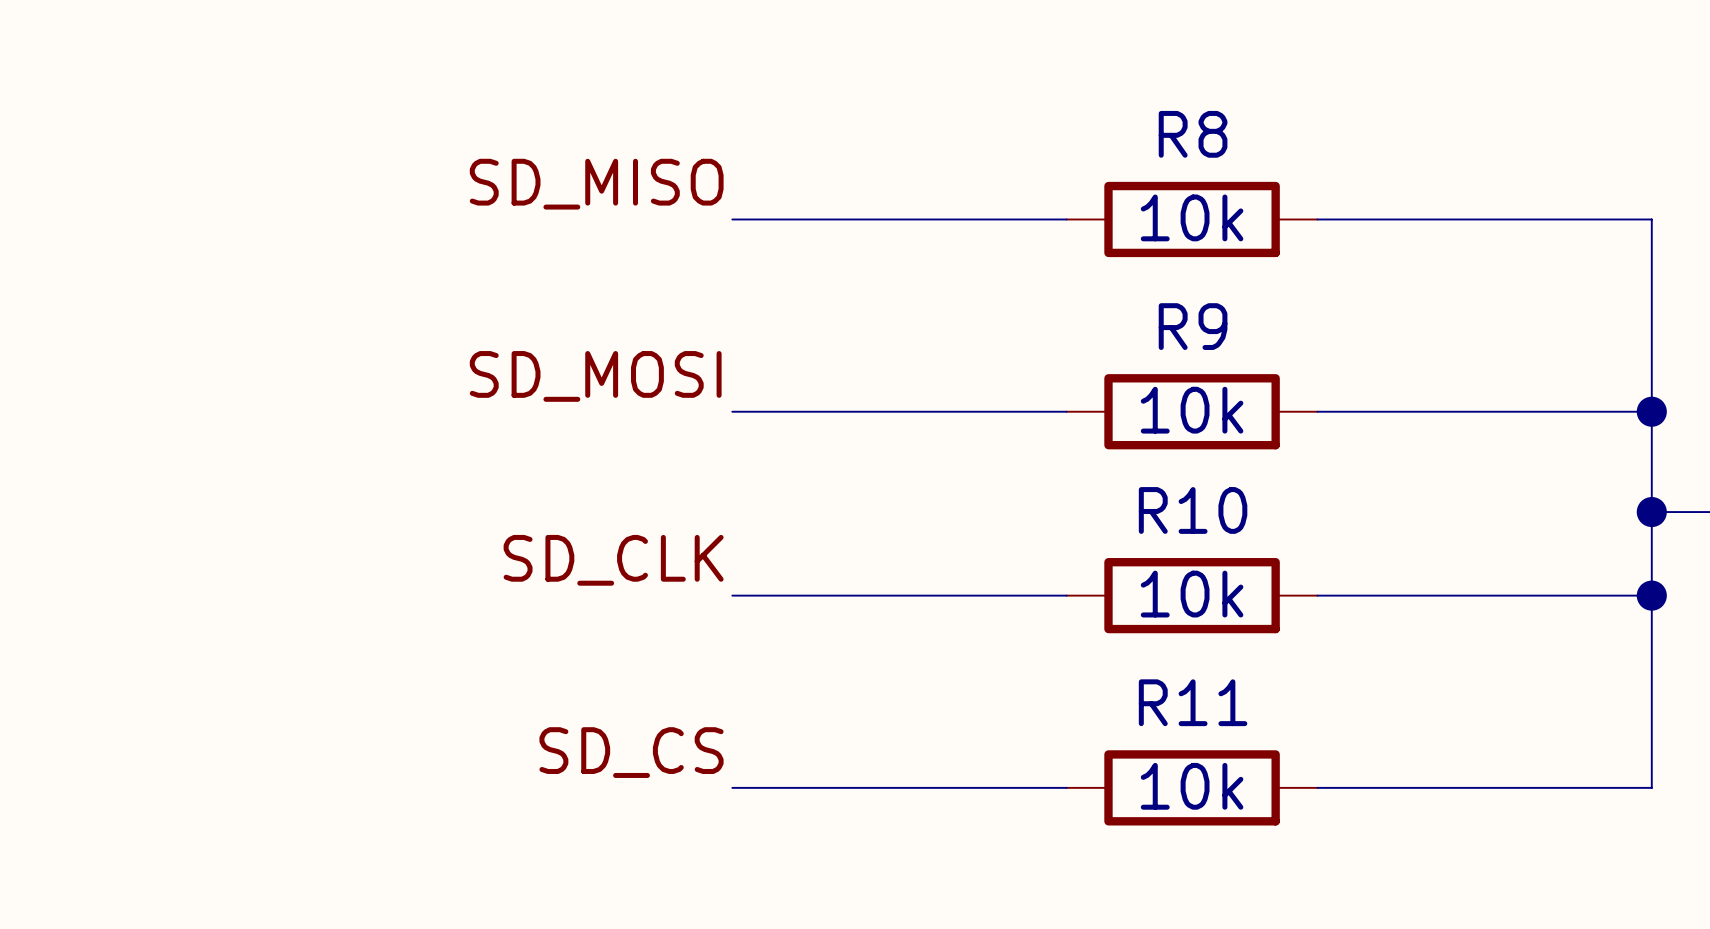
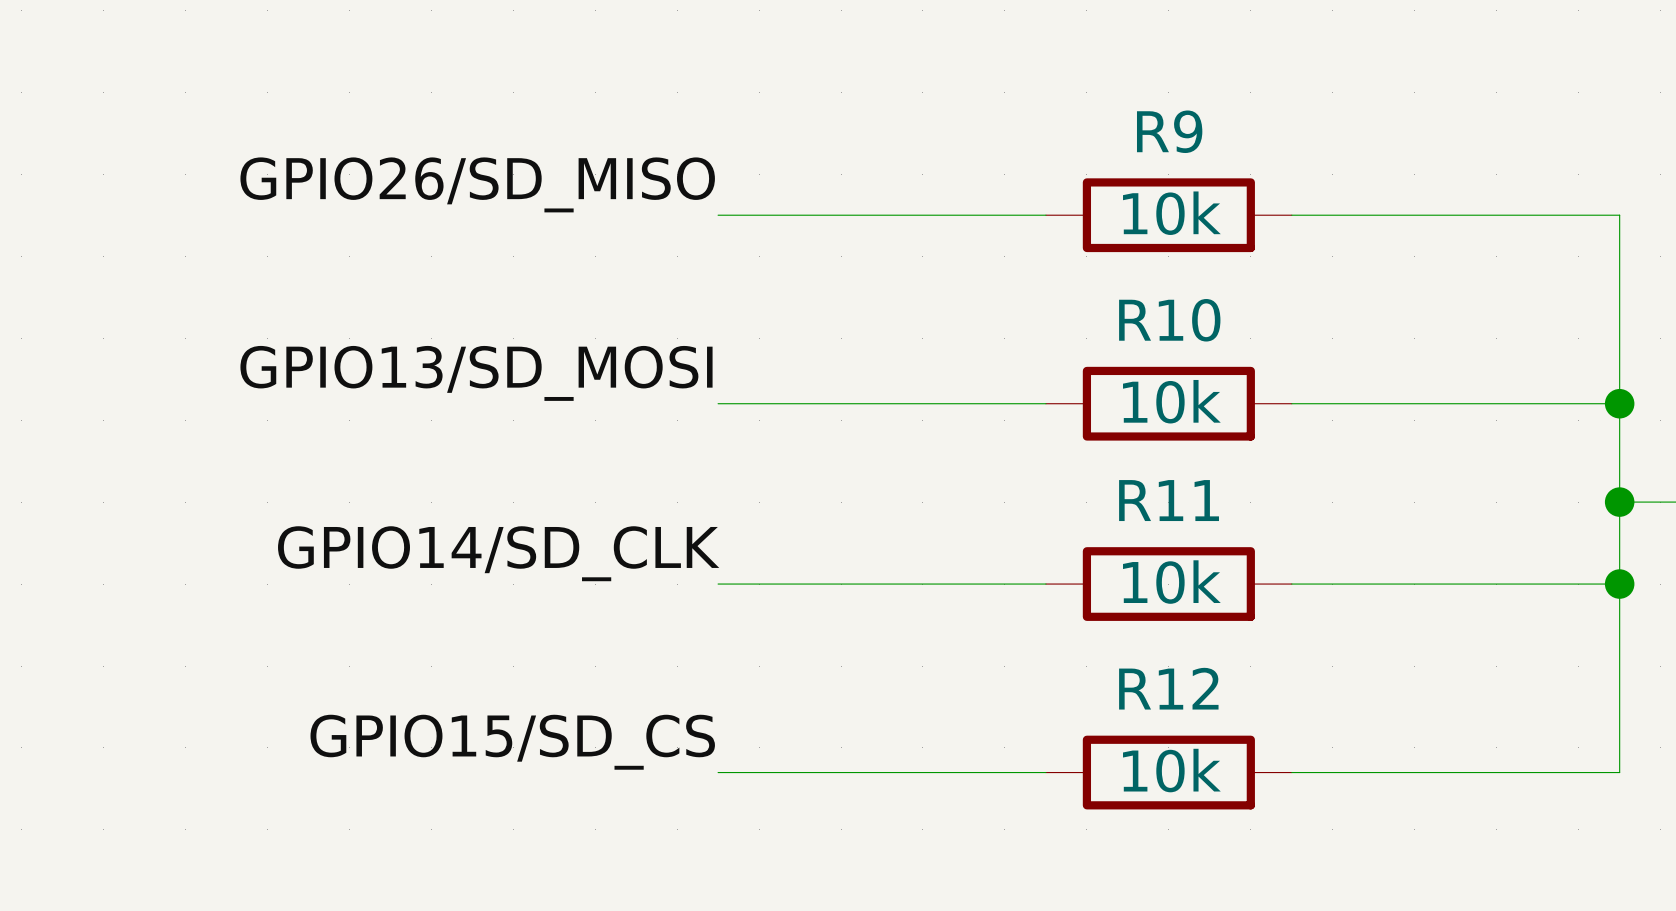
R8 name: R8 (1193, 134) -> R9 (1169, 131)
label: SD_MISO (596, 184) -> GPIO26/SD_MISO (477, 184)
R9 name: R9 (1193, 326) -> R10 (1169, 320)
label: SD_MOSI (595, 376) -> GPIO13/SD_MOSI (476, 373)
R10 name: R10 (1193, 510) -> R11 (1169, 500)
label: SD_CLK (613, 560) -> GPIO14/SD_CLK (498, 553)
R11 name: R11 (1193, 702) -> R12 (1168, 688)
label: SD_CS (631, 752) -> GPIO15/SD_CS (512, 742)

